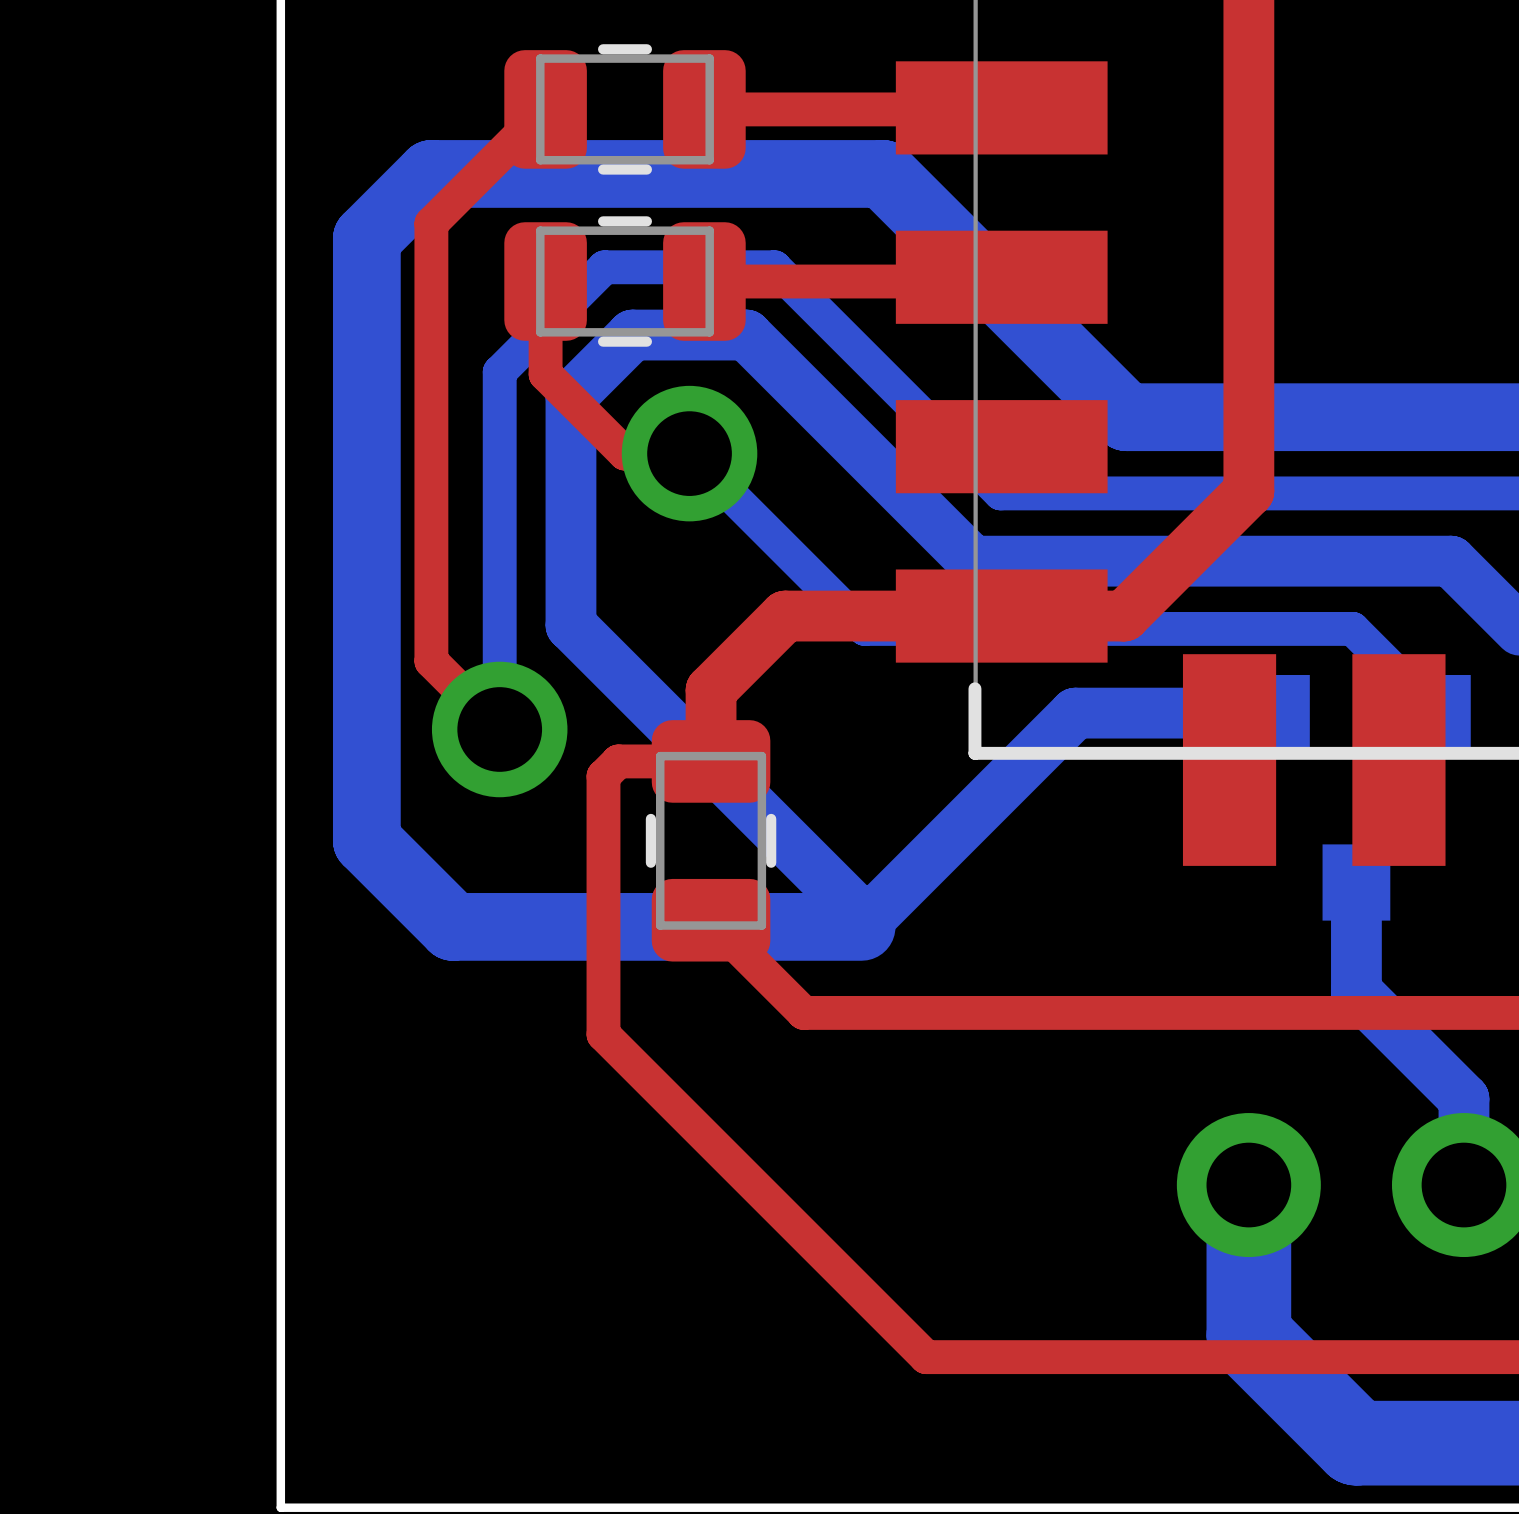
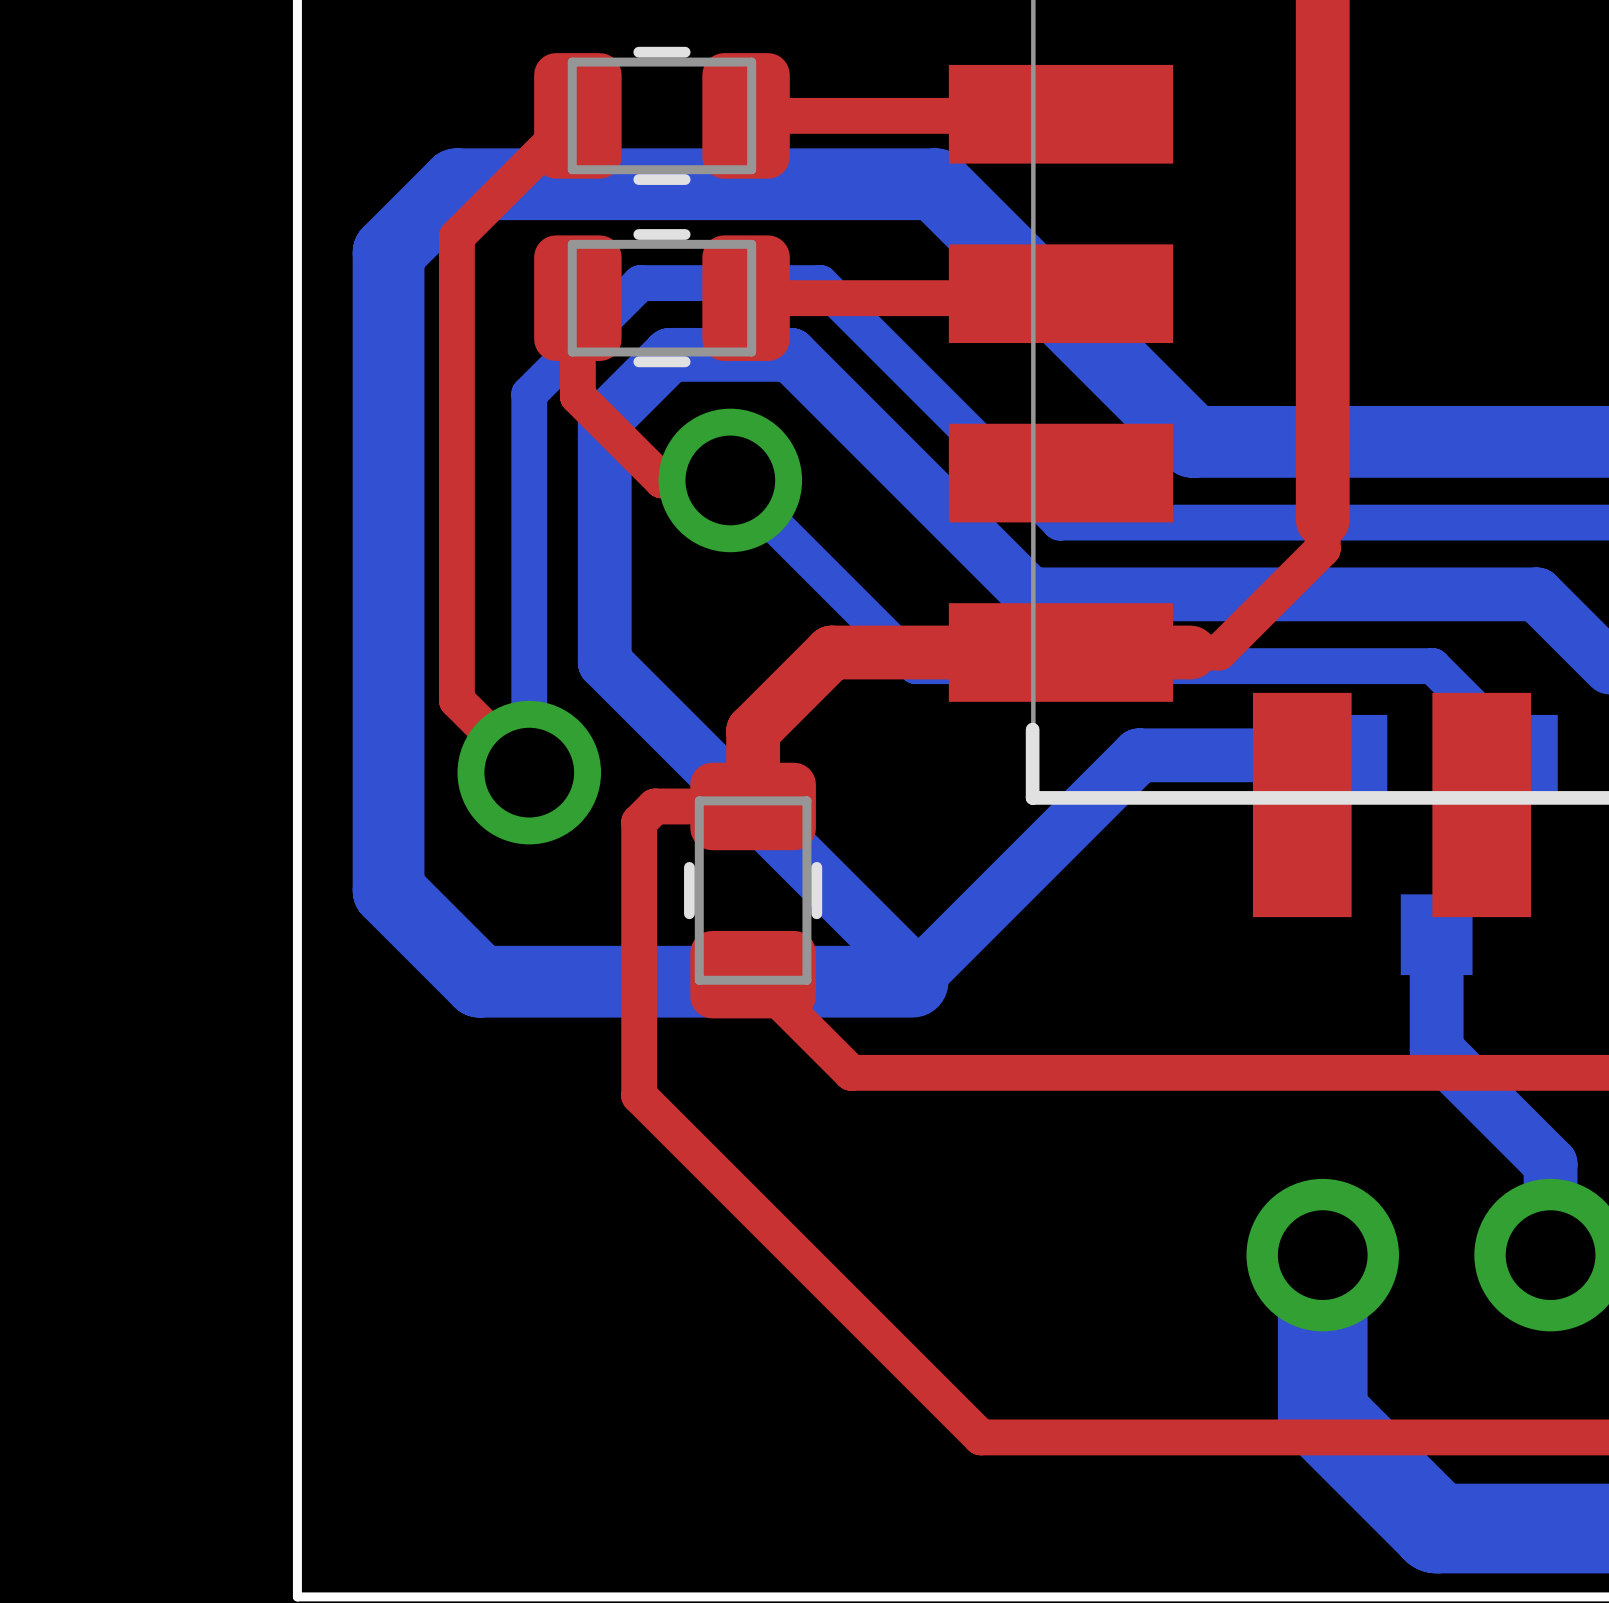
top track: (1248, 491) (1124, 616) -> (1322, 520) (1322, 548) (1219, 652) (1190, 652)

